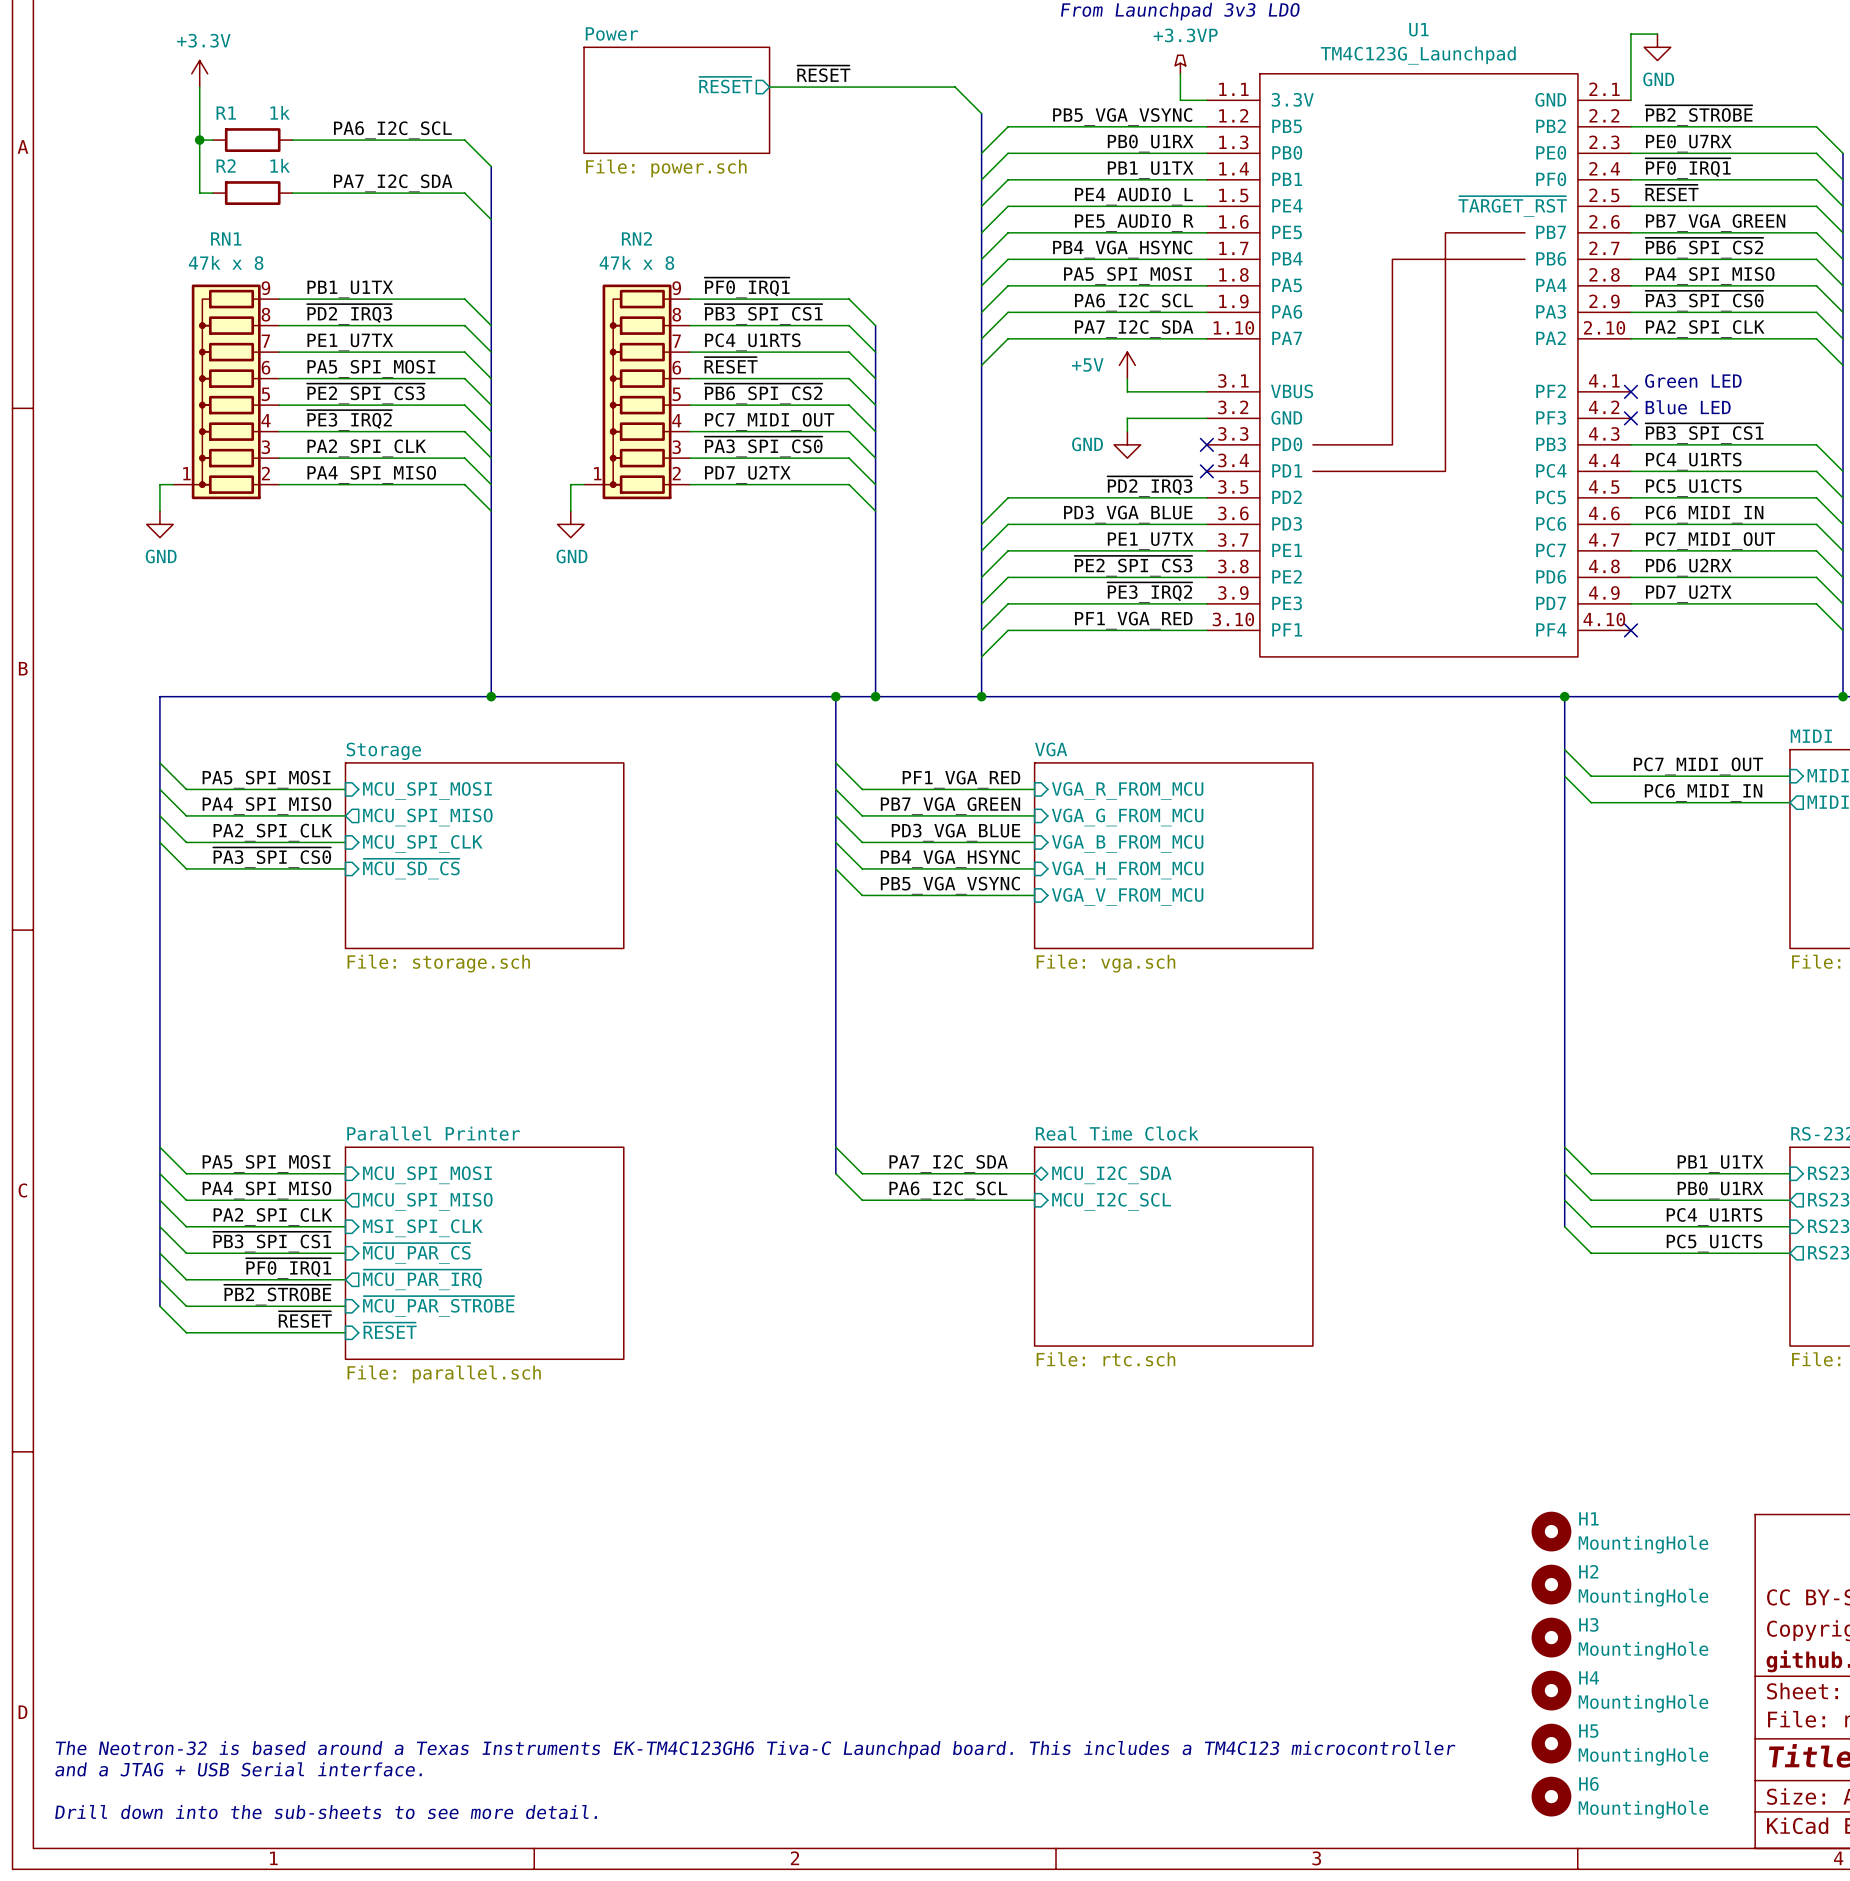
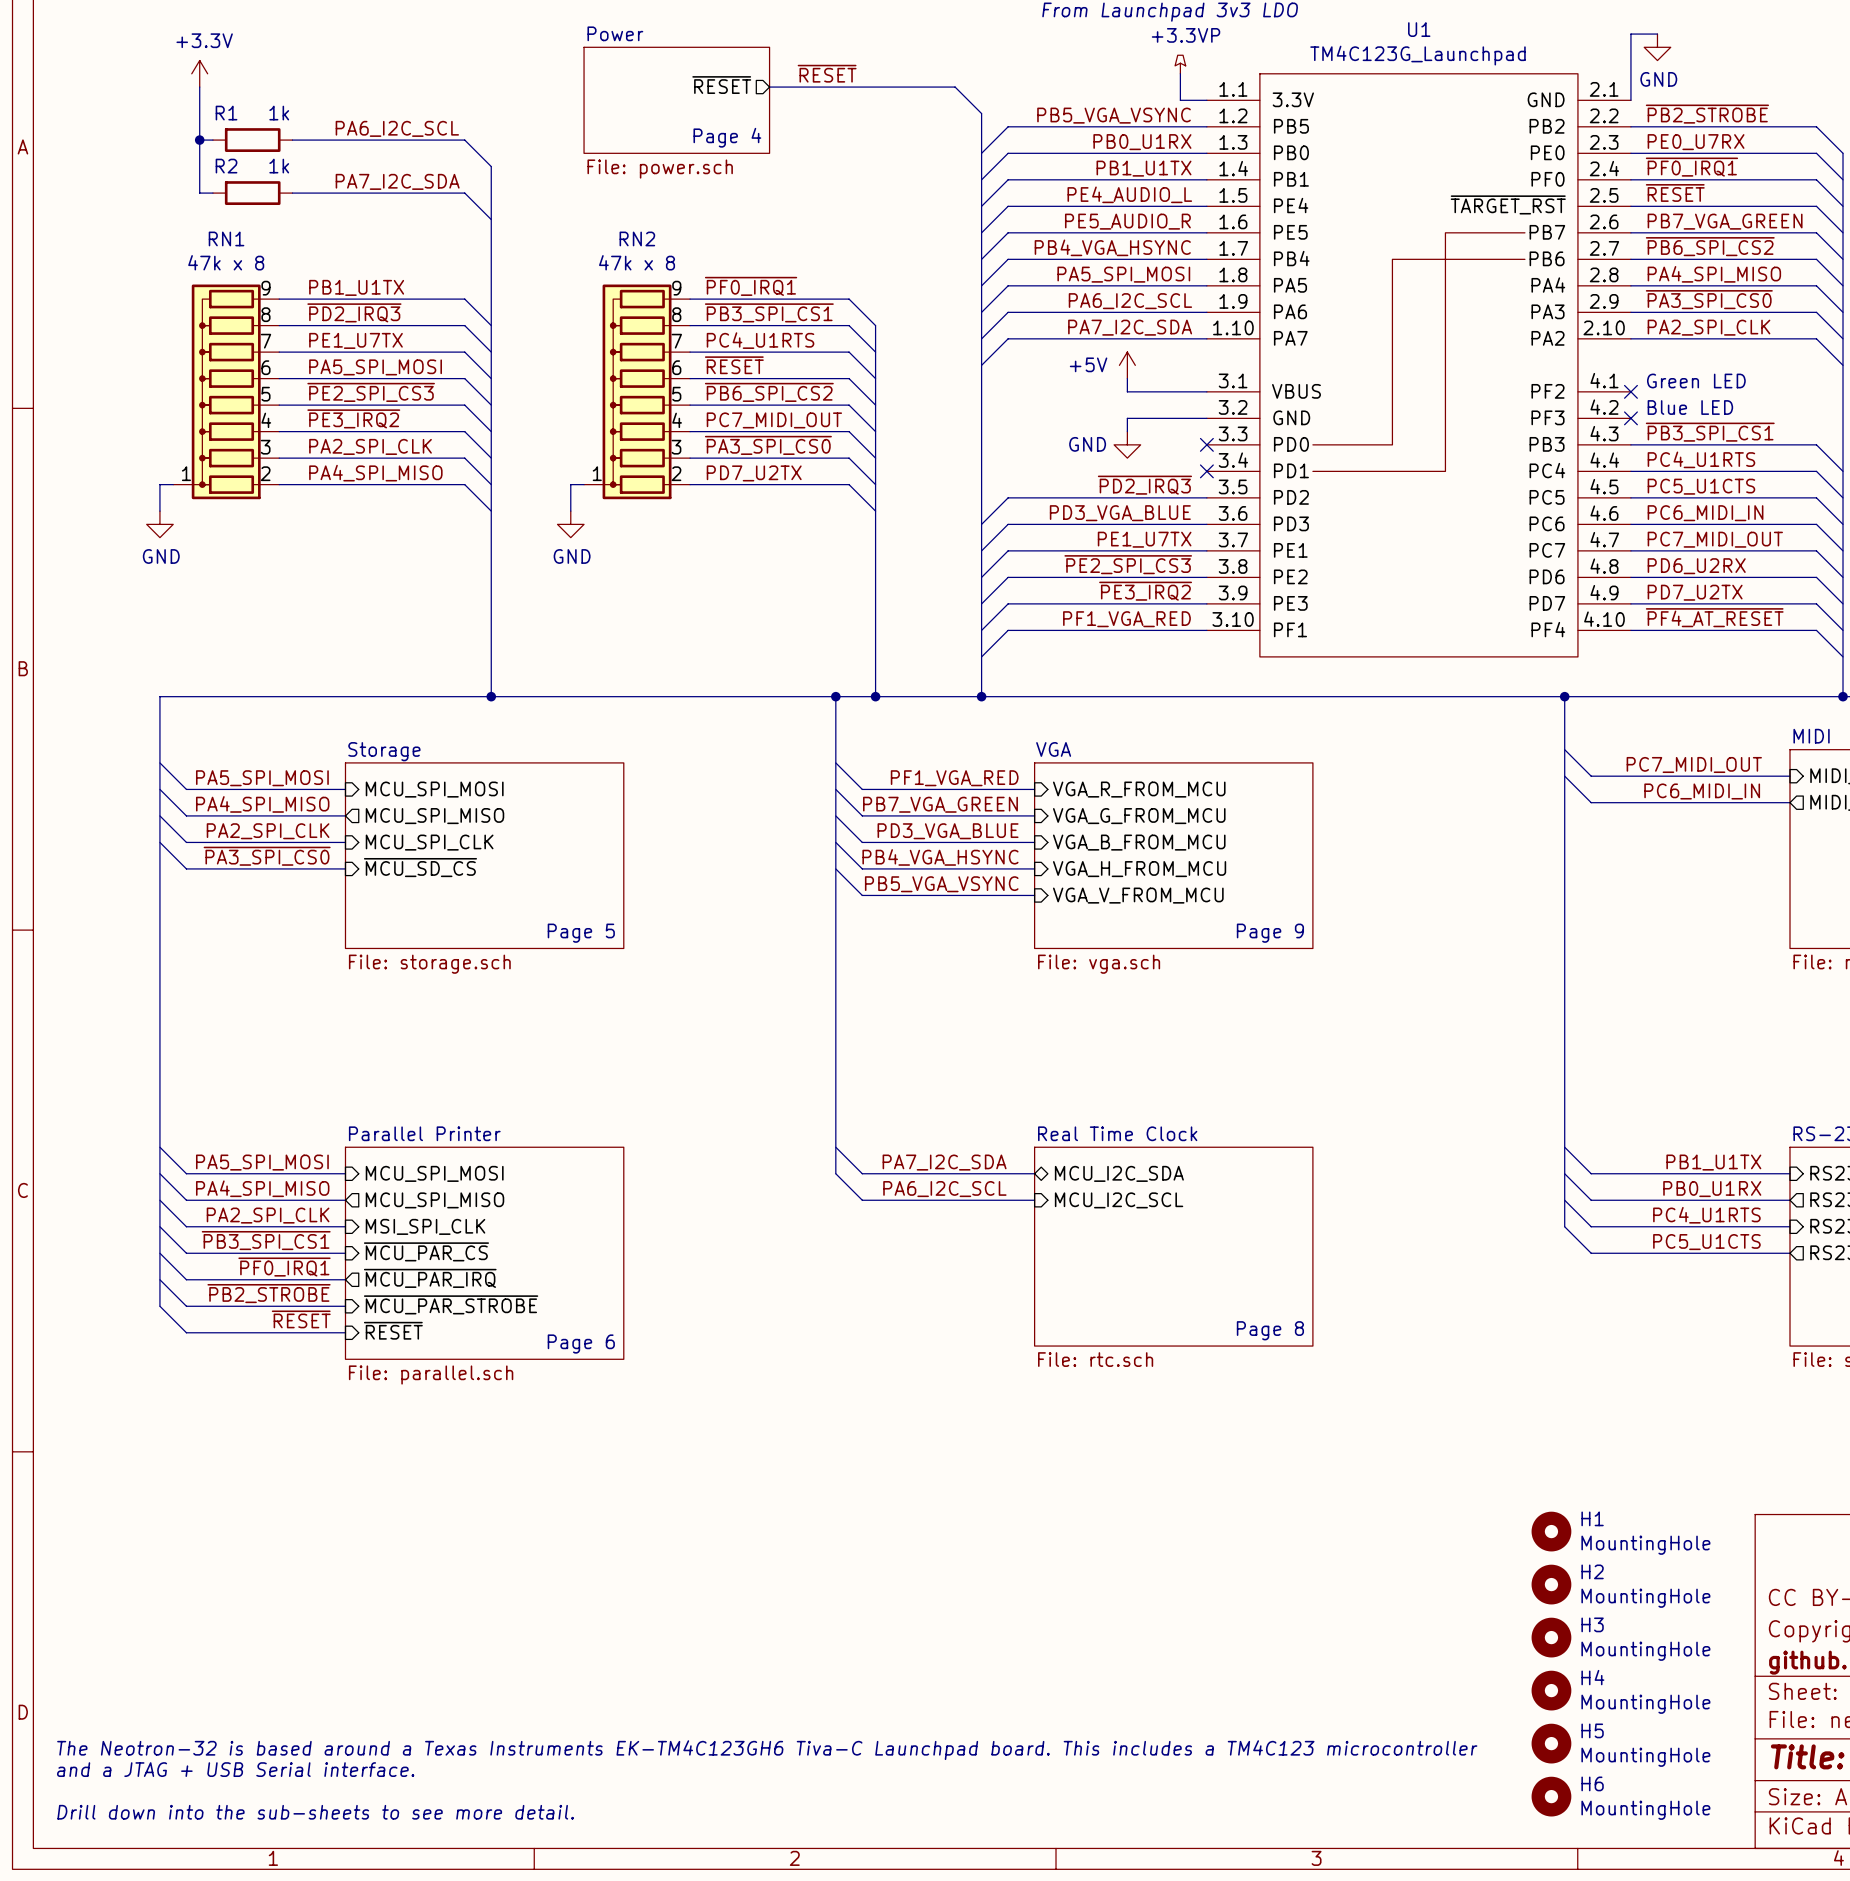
text: none -> Page 4 (727, 137)
label: none -> ~{PF4_AT_RESET} (1714, 617)
wire: none -> (1630, 630) (1816, 630) (1843, 656)
no-connect mark: (1630, 630) -> none
text: none -> Page 5 (581, 933)
text: none -> Page 9 (1270, 933)
text: none -> Page 8 (1270, 1330)
text: none -> Page 6 (581, 1344)

